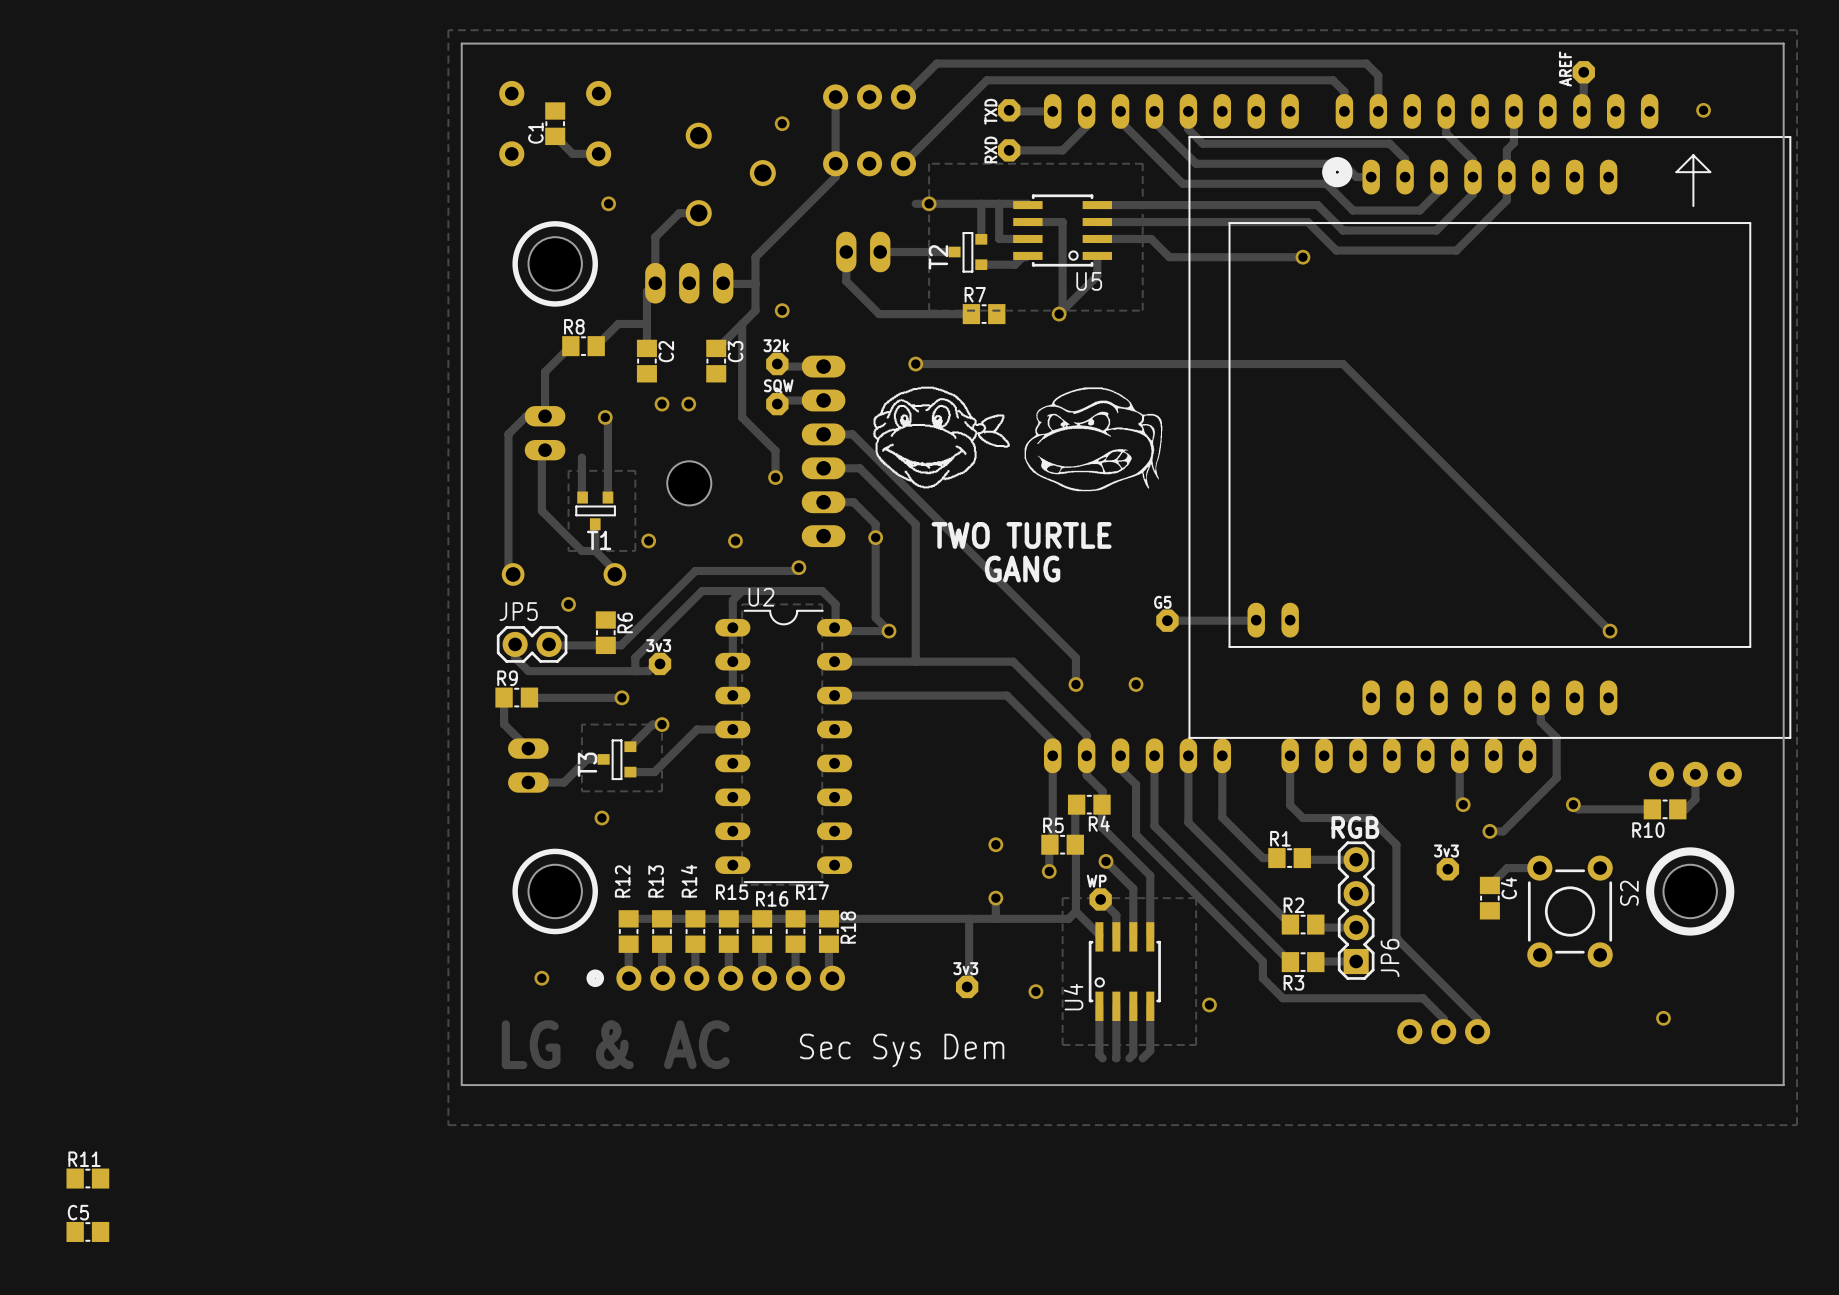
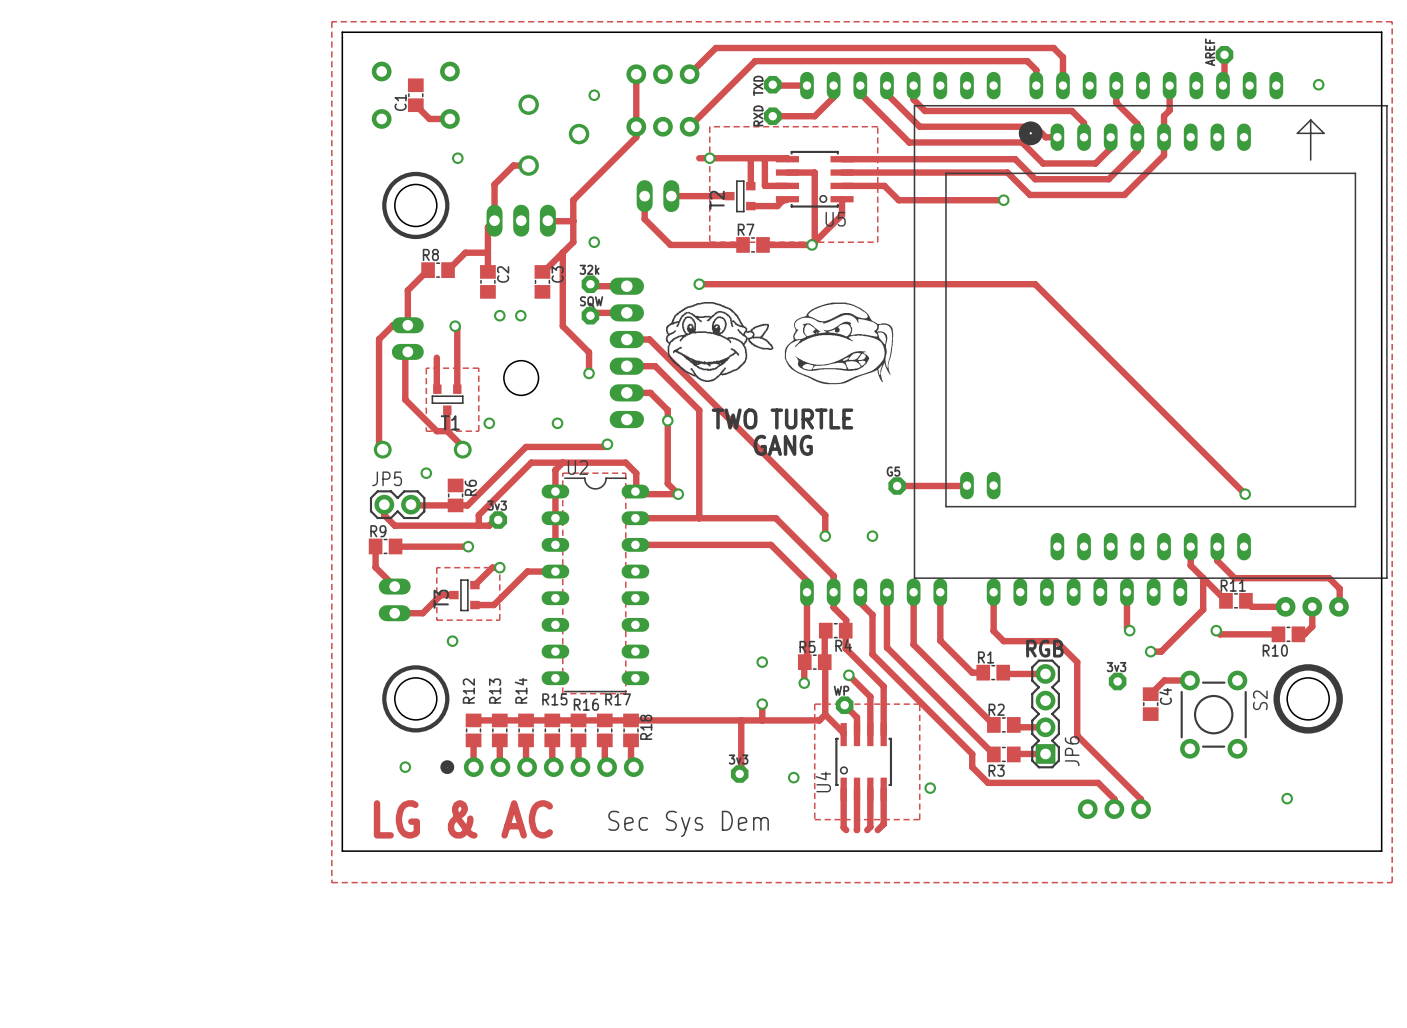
track: none -> (762, 244) (812, 244)
track: none -> (1217, 546) (1217, 560) (1234, 578) (1329, 578) (1339, 588) (1338, 606)
track: none -> (1203, 578) (1225, 600)
track: none -> (1245, 600) (1251, 606) (1285, 606)
R11 position: (87, 1178) -> (1235, 600)
C5: (87, 1231) -> none

